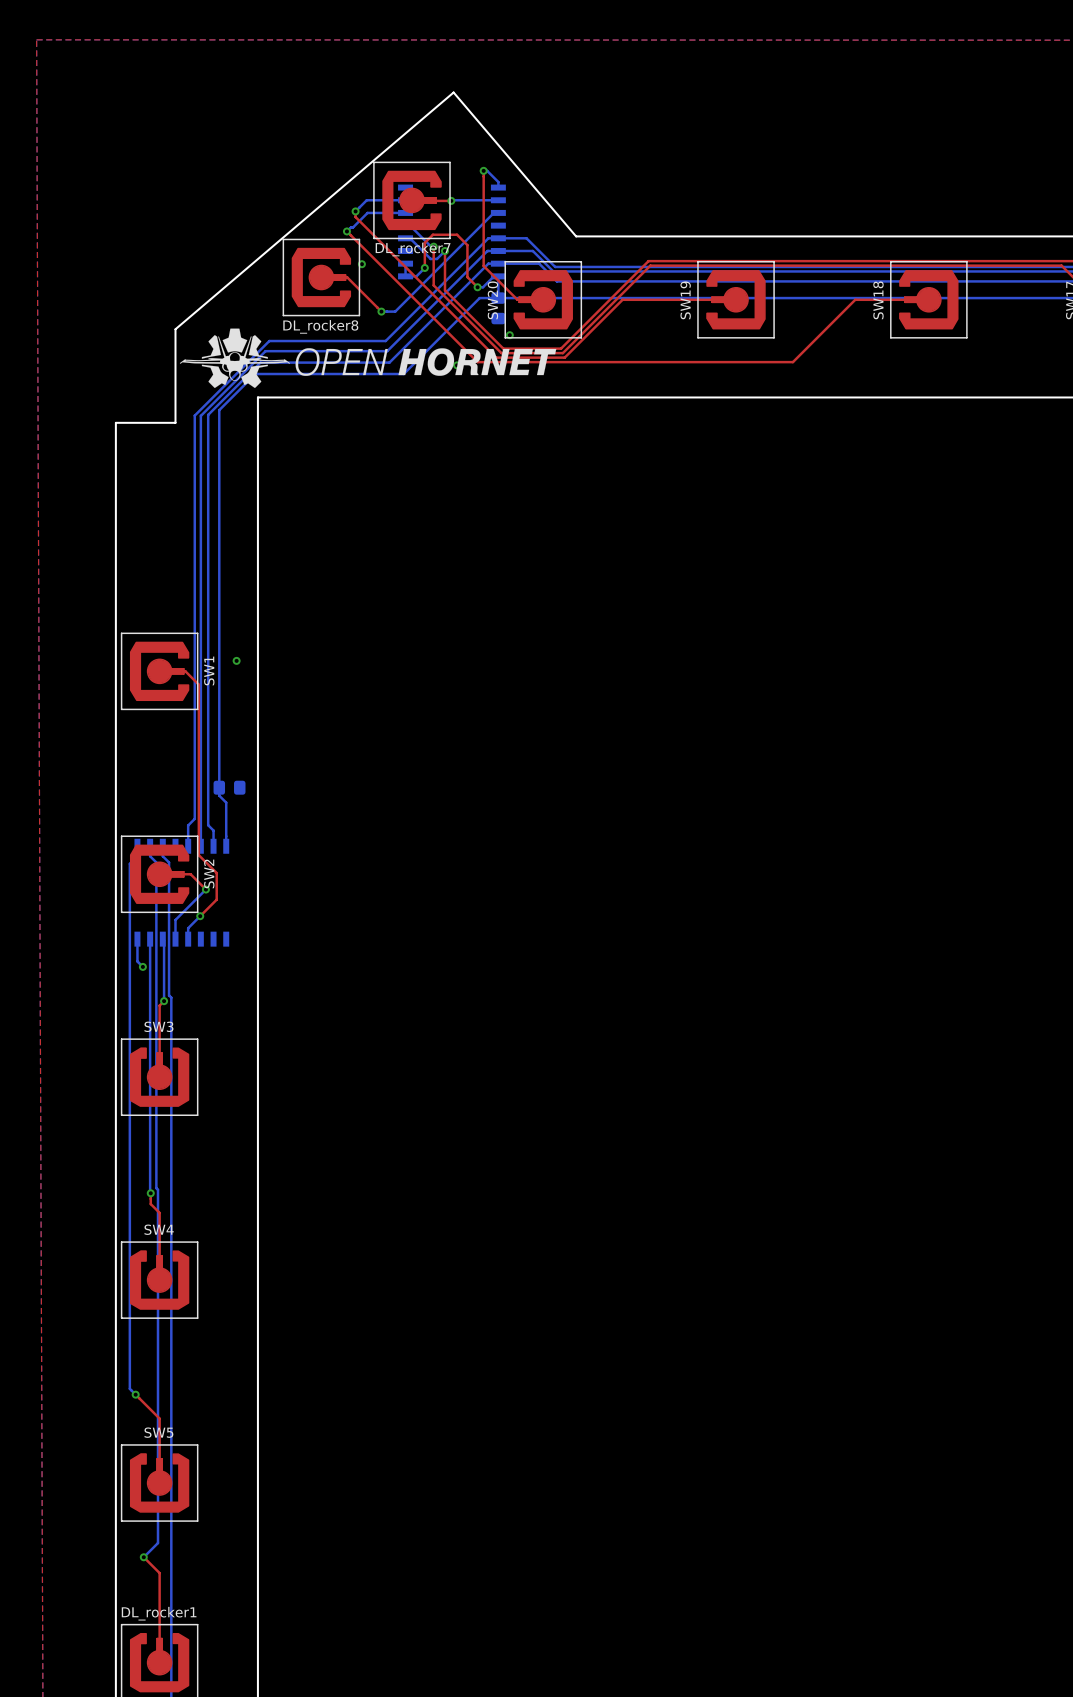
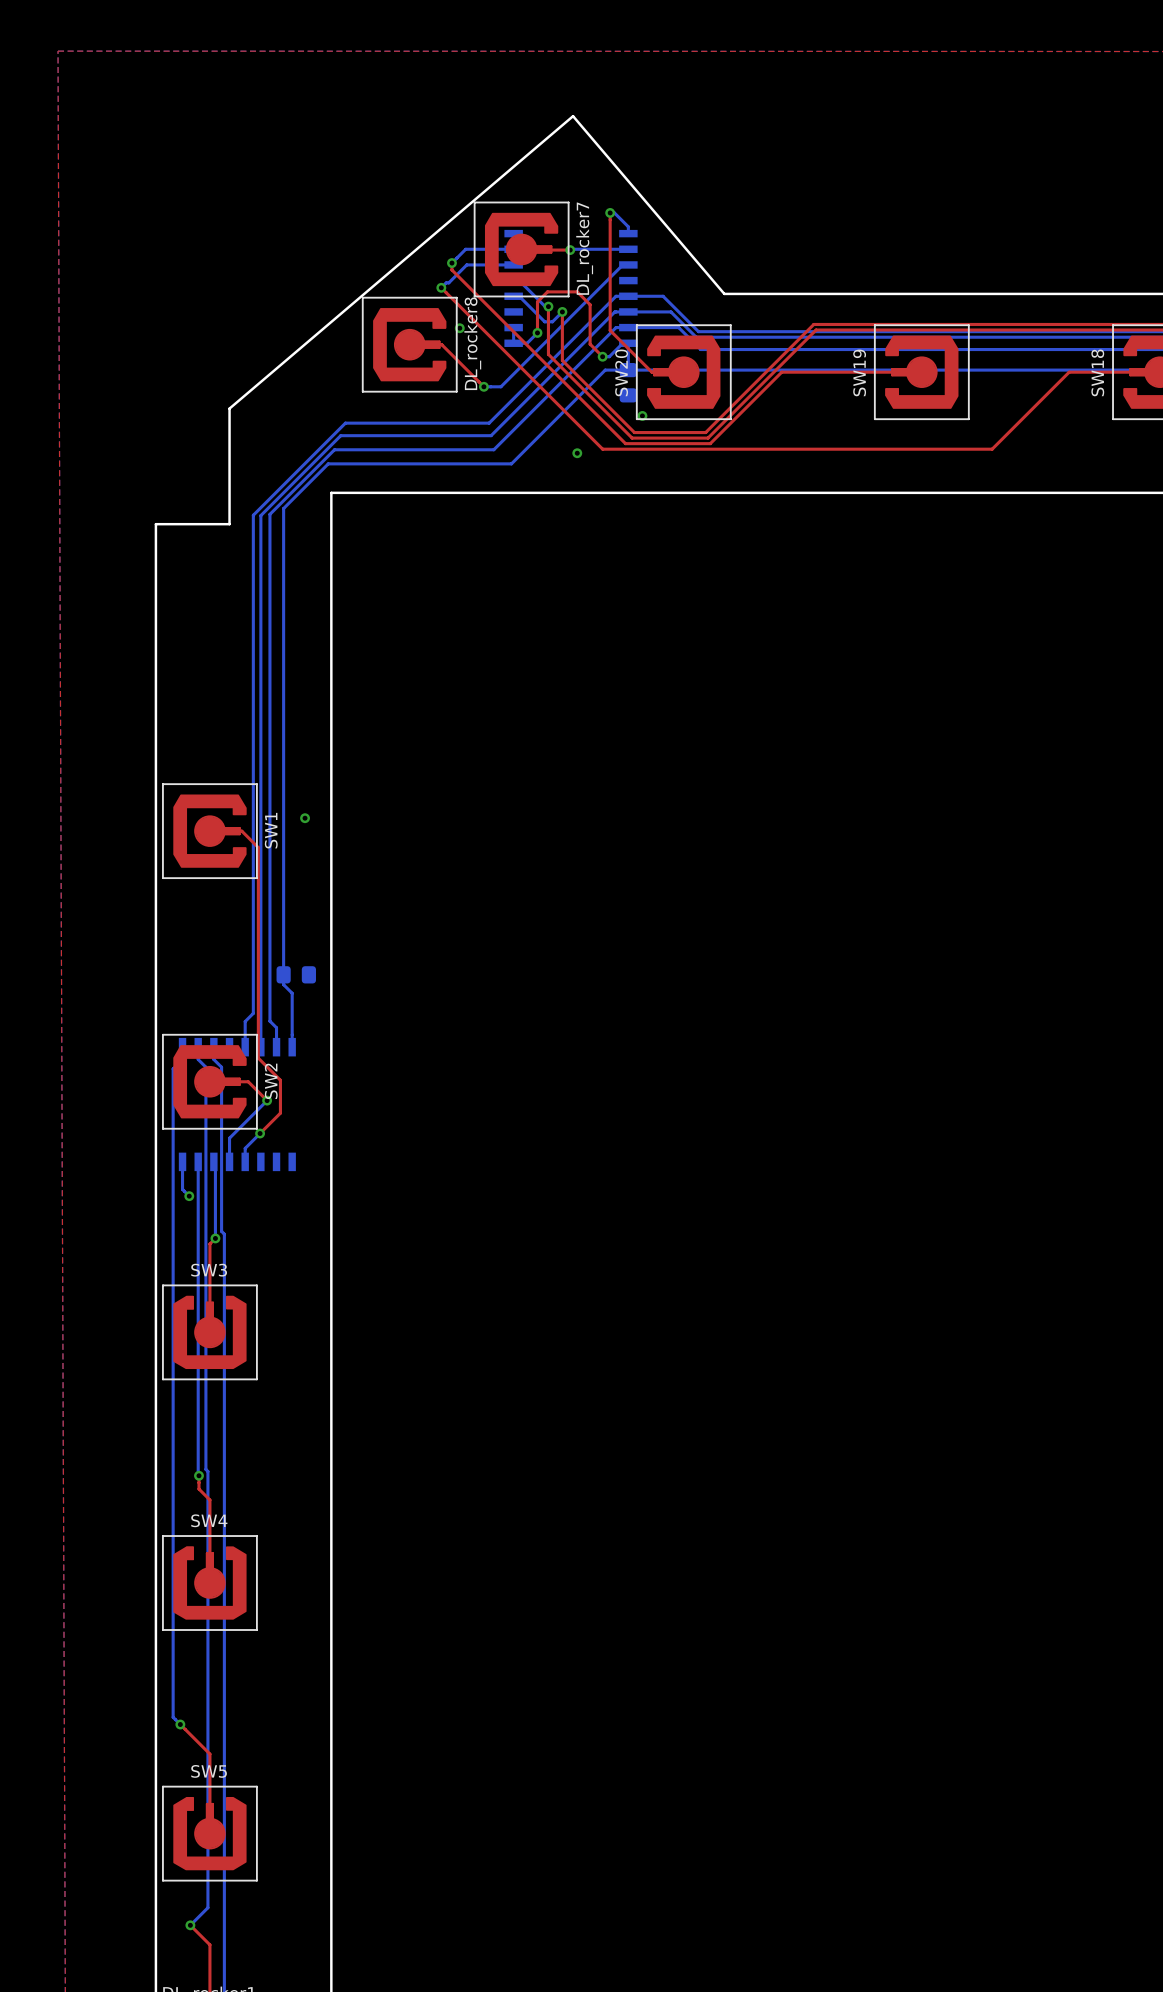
DL_rocker7 name rotation: 0° (413, 249) -> 90° counterclockwise (584, 248)
DL_rocker8 name rotation: 0° (320, 326) -> 90° counterclockwise (472, 343)
drawing: [179, 328, 557, 388] -> none

